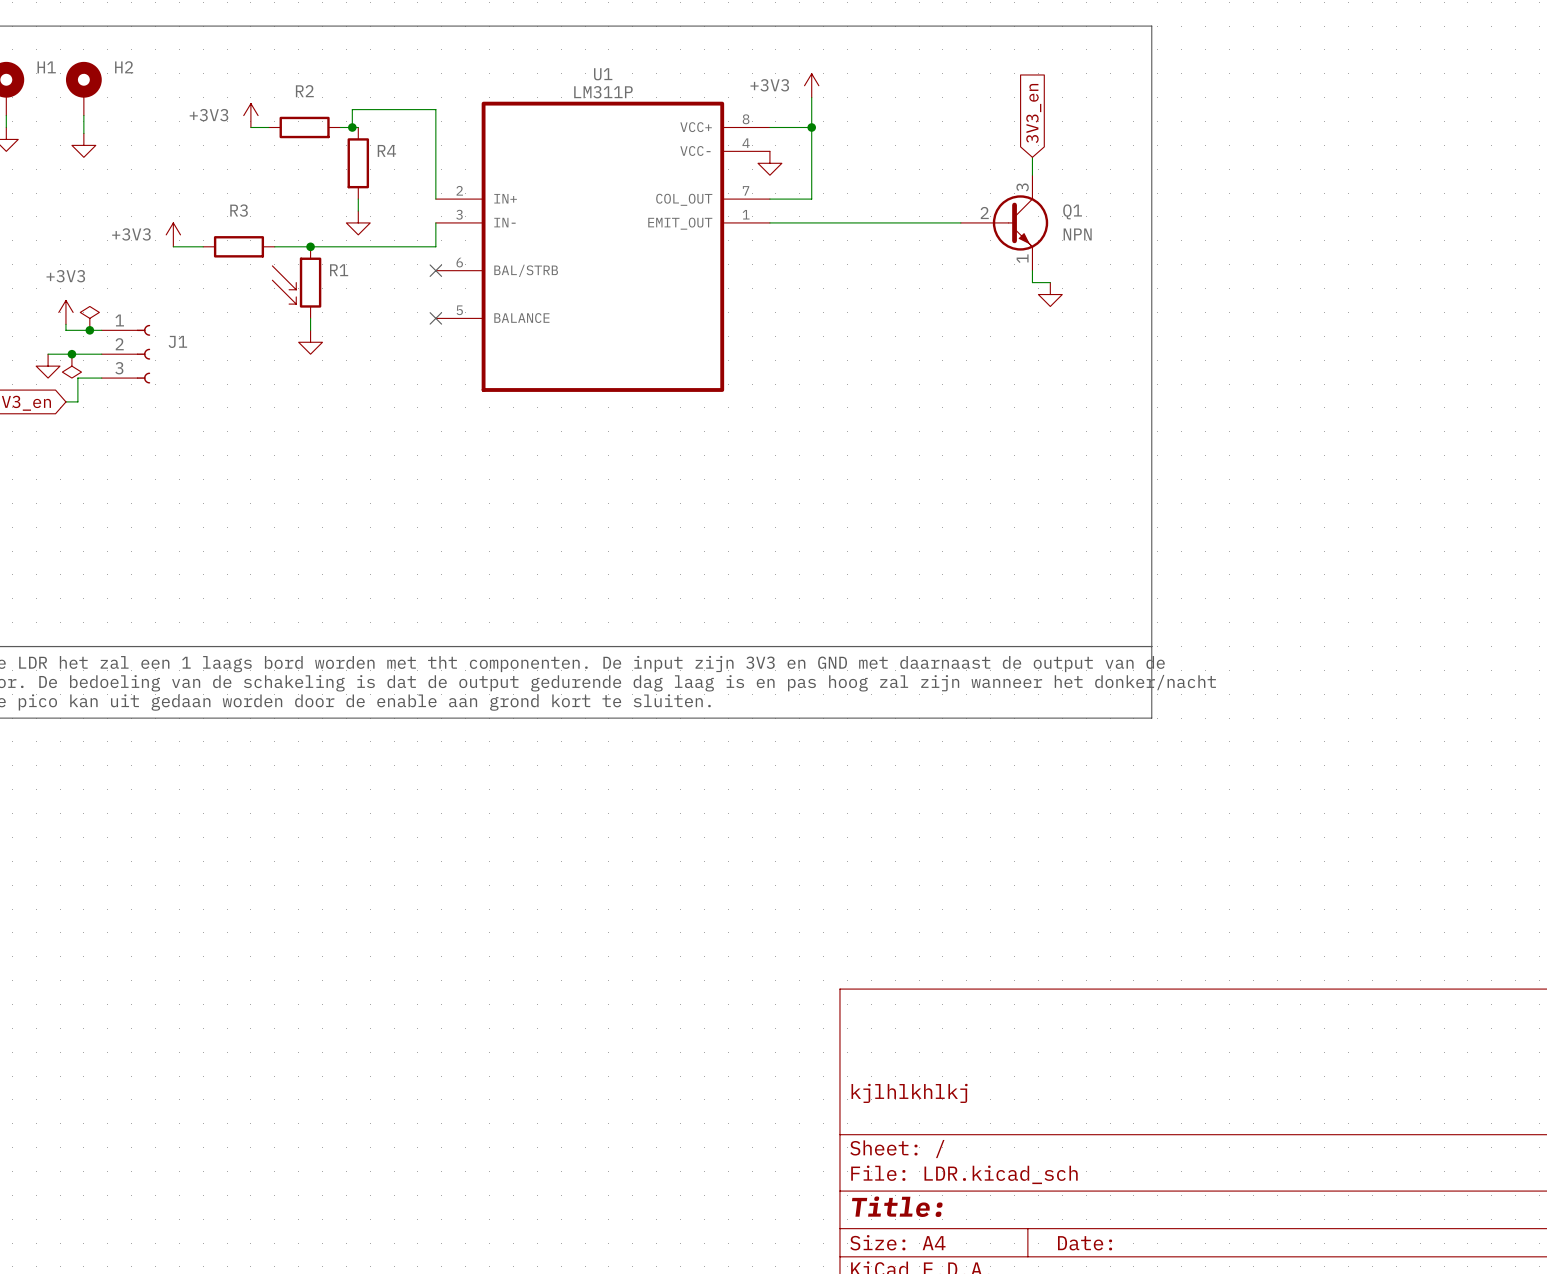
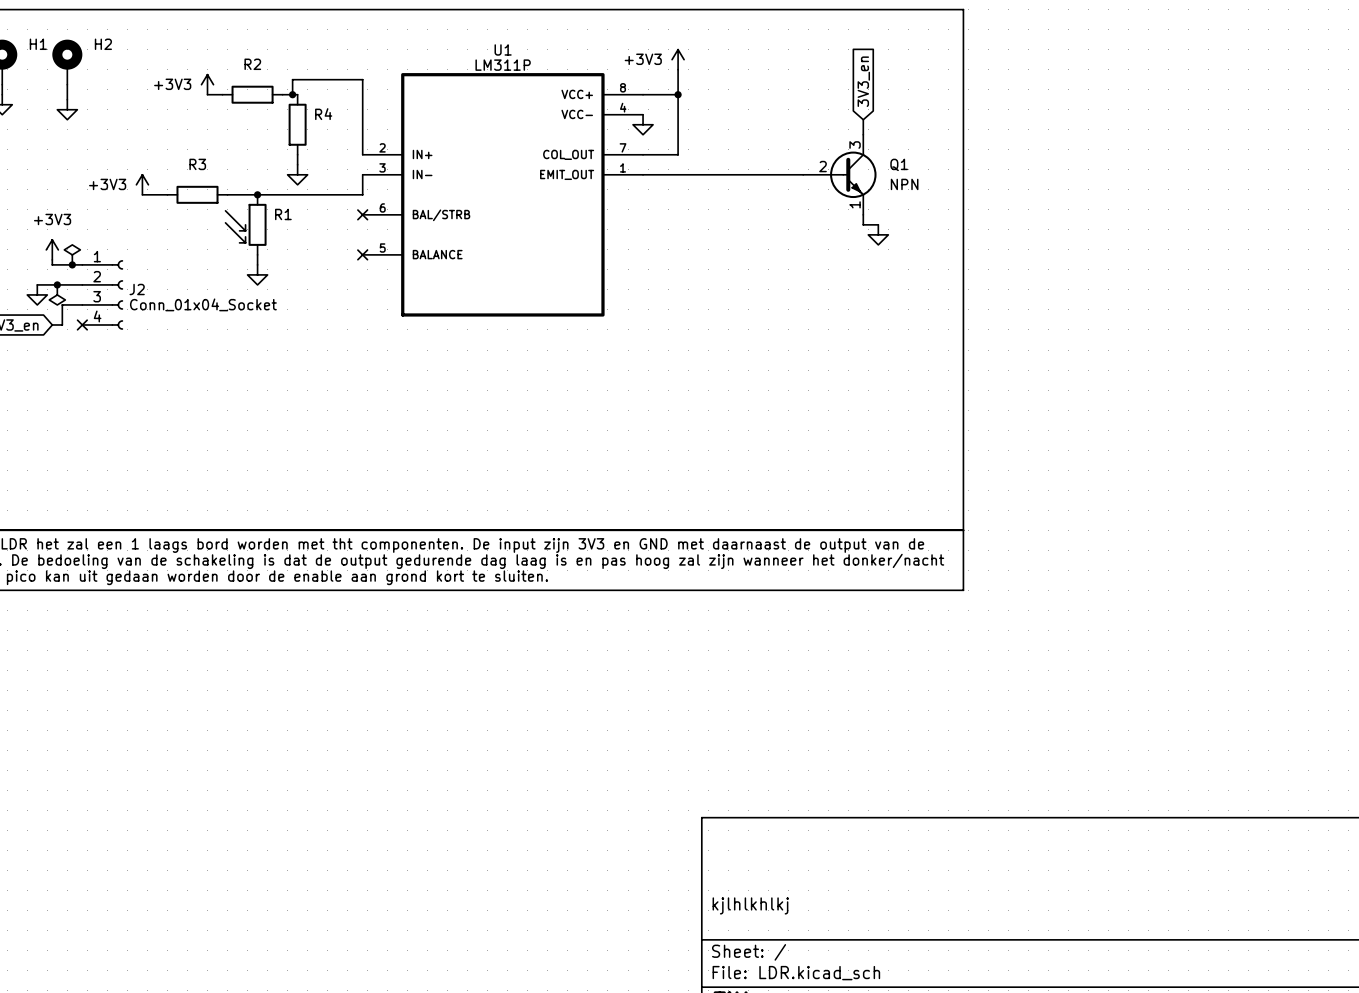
J1: (125, 354) -> none
J2: none -> Conn_01x04_Socket (102, 294)
no-connect mark: none -> (82, 324)

